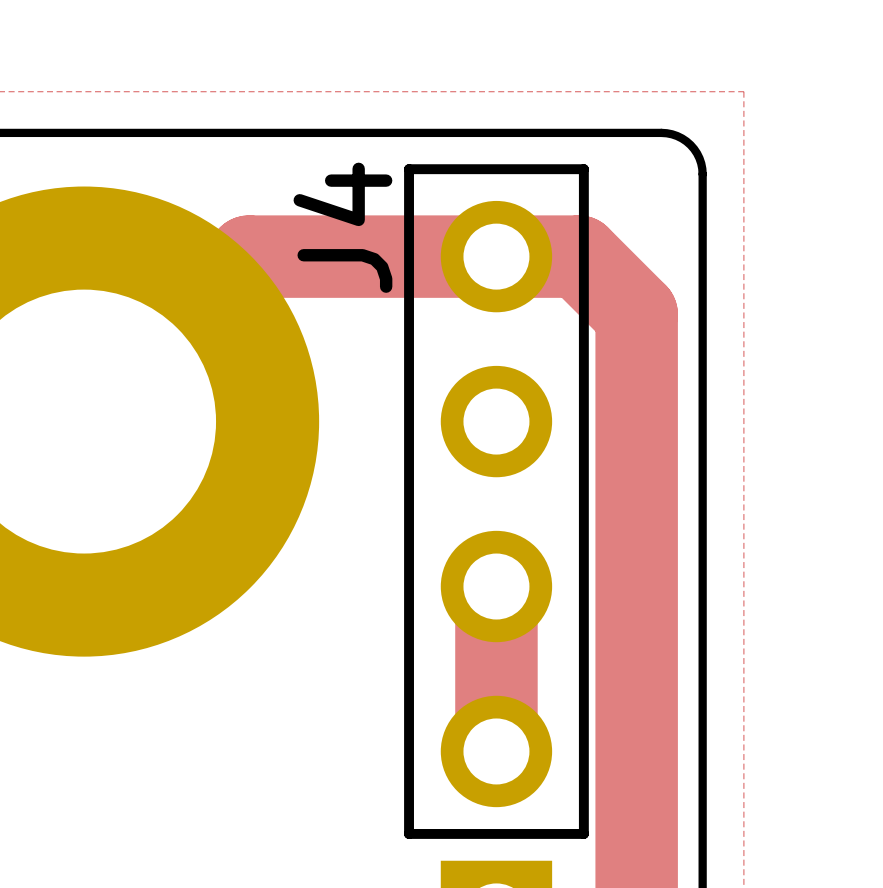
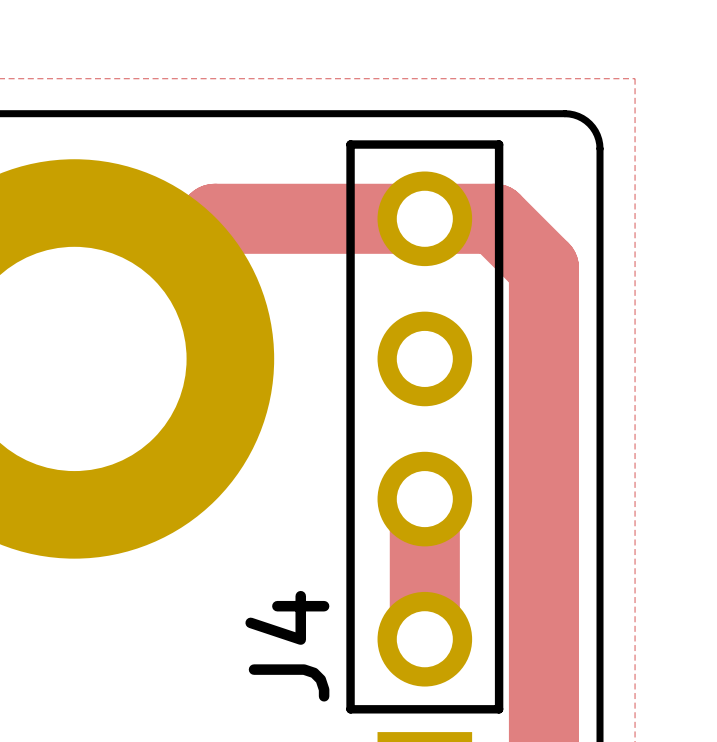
J4 name position: J4 (342, 227) -> J4 (287, 646)

